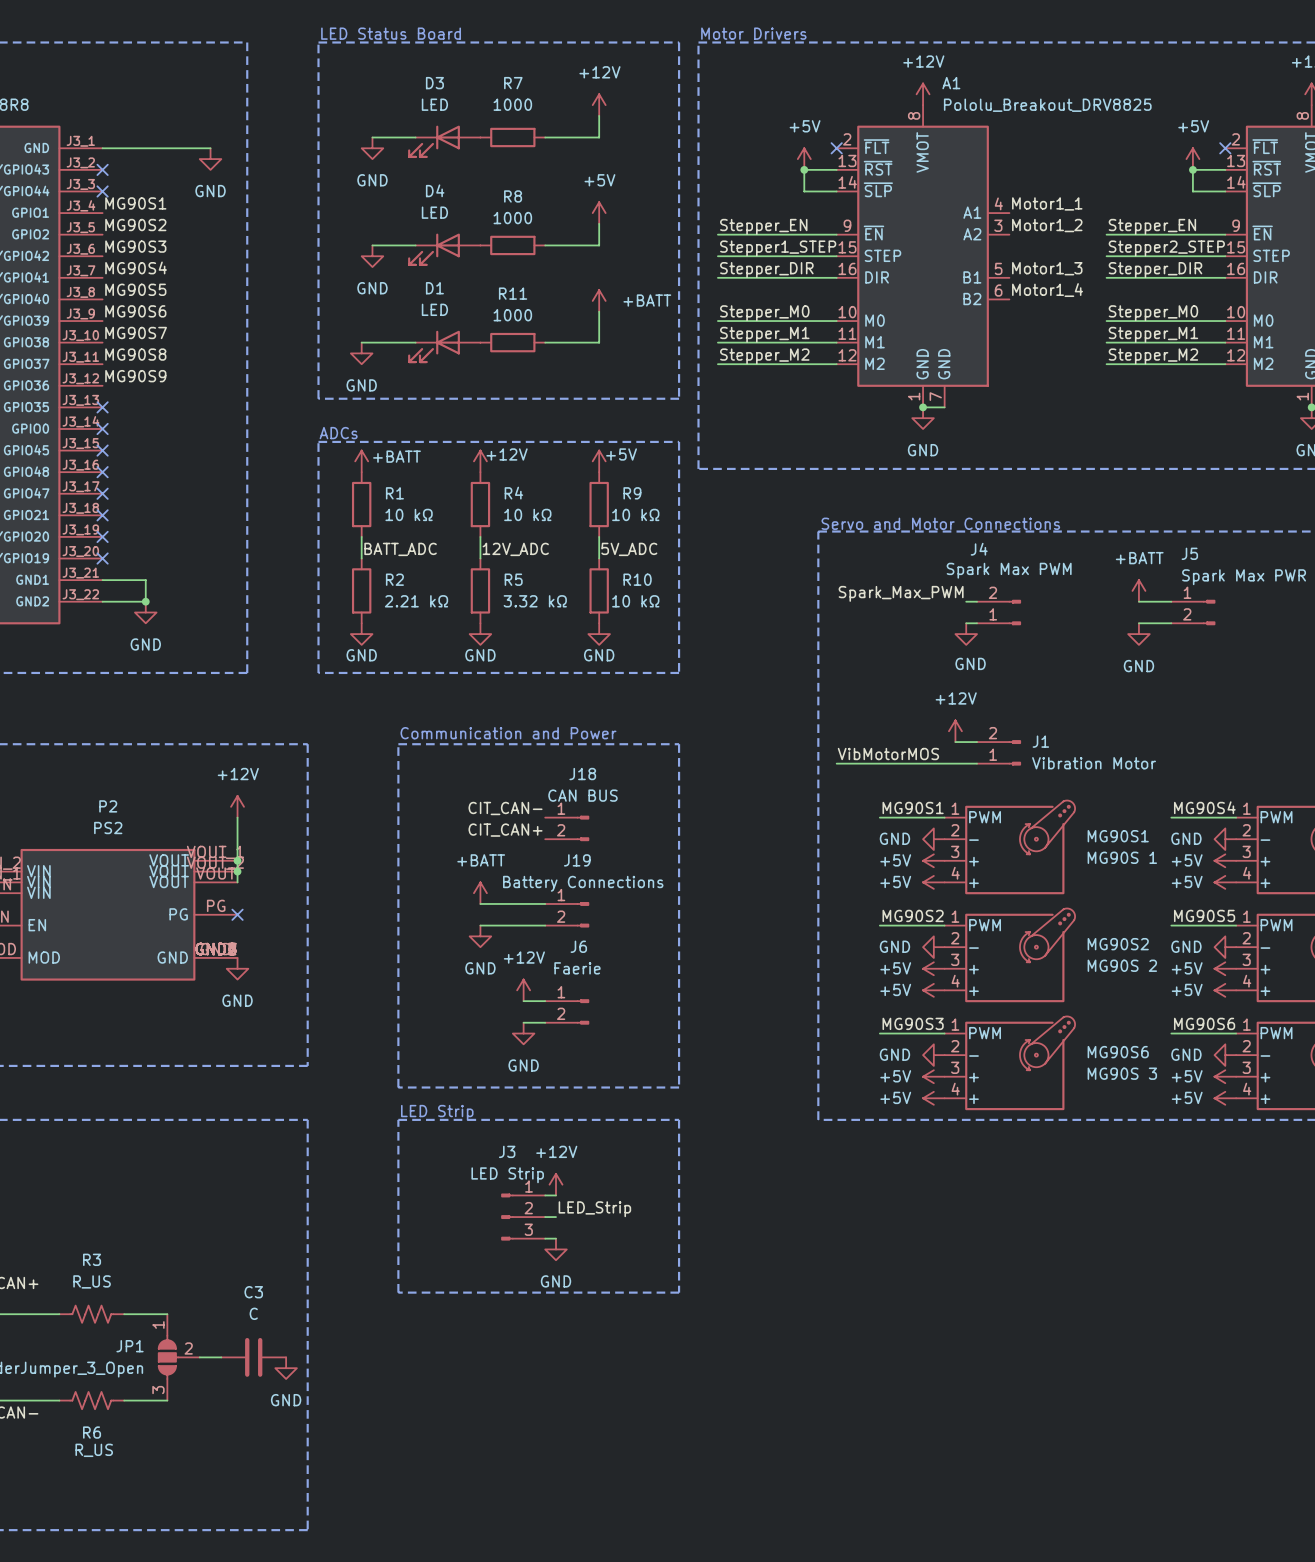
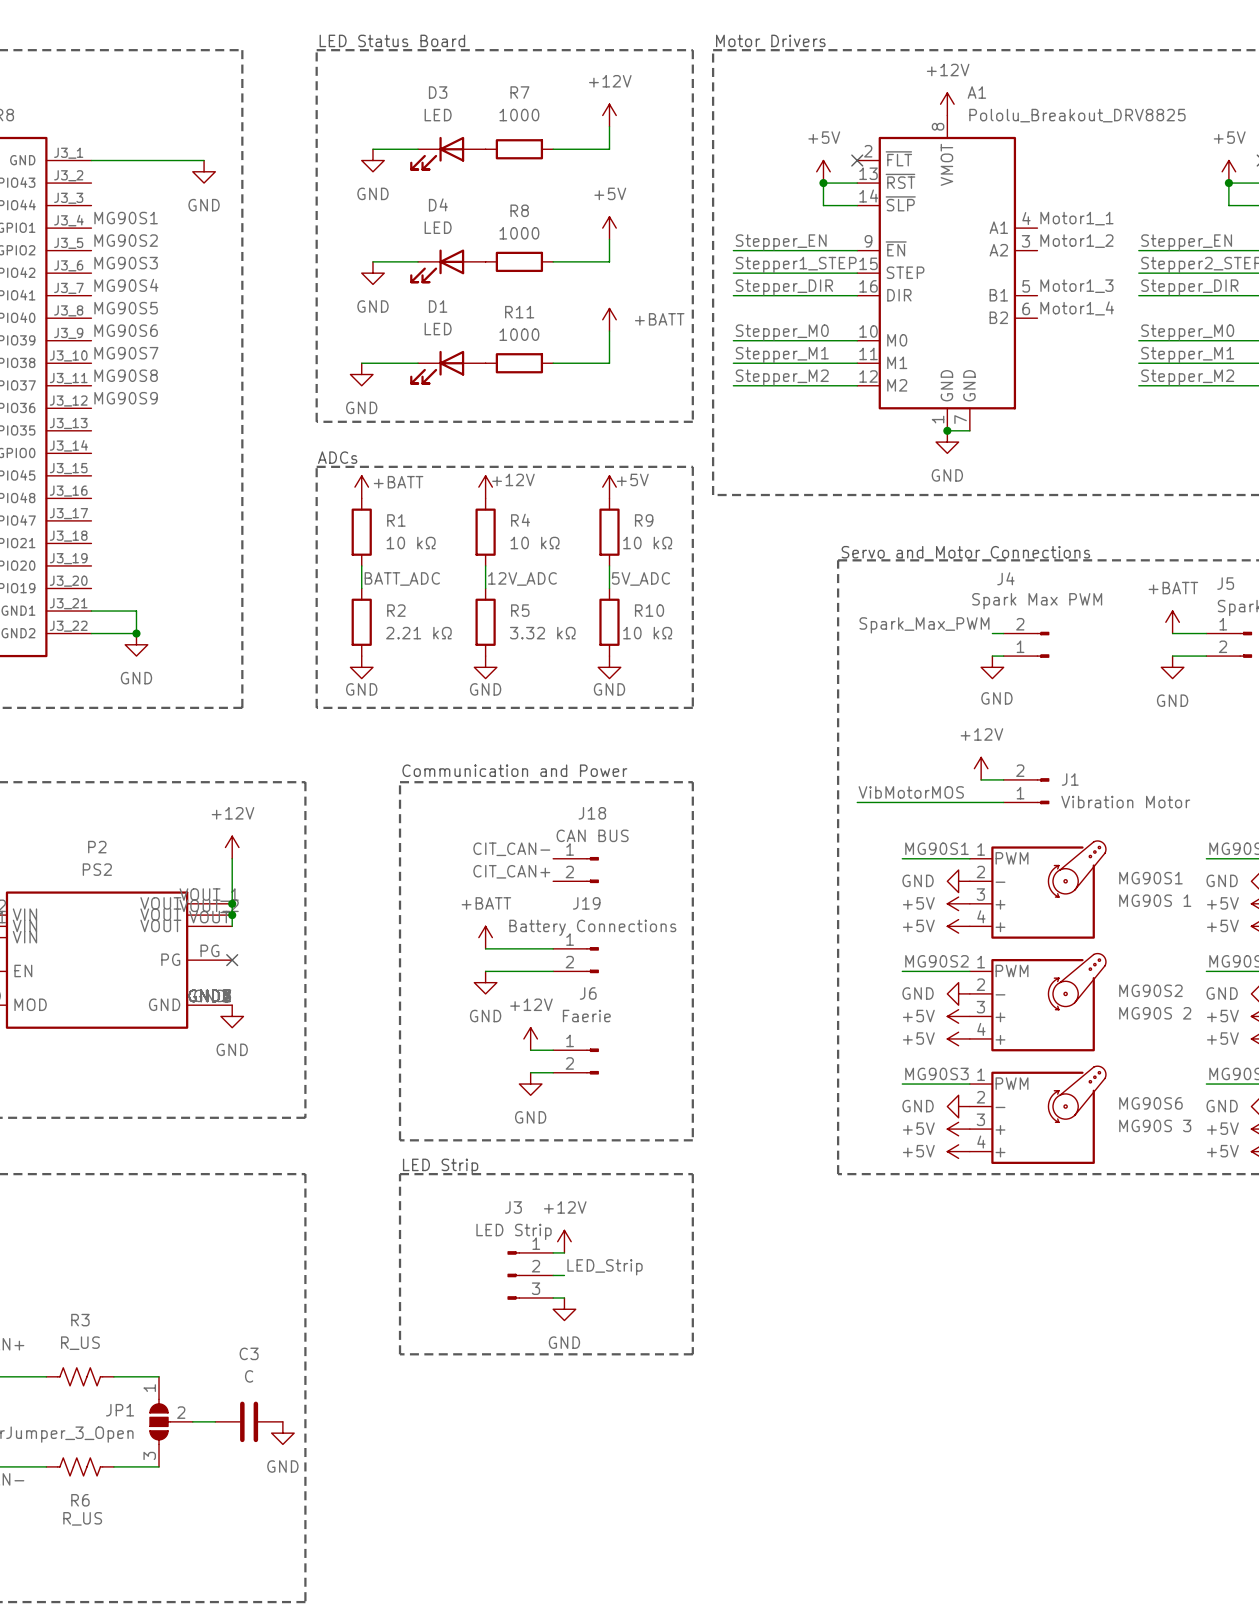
no-connect mark: (102, 169) -> none
no-connect mark: (102, 191) -> none
no-connect mark: (102, 407) -> none
no-connect mark: (102, 428) -> none
no-connect mark: (102, 450) -> none
no-connect mark: (102, 472) -> none
no-connect mark: (102, 493) -> none
no-connect mark: (102, 515) -> none
no-connect mark: (102, 536) -> none
no-connect mark: (102, 558) -> none

